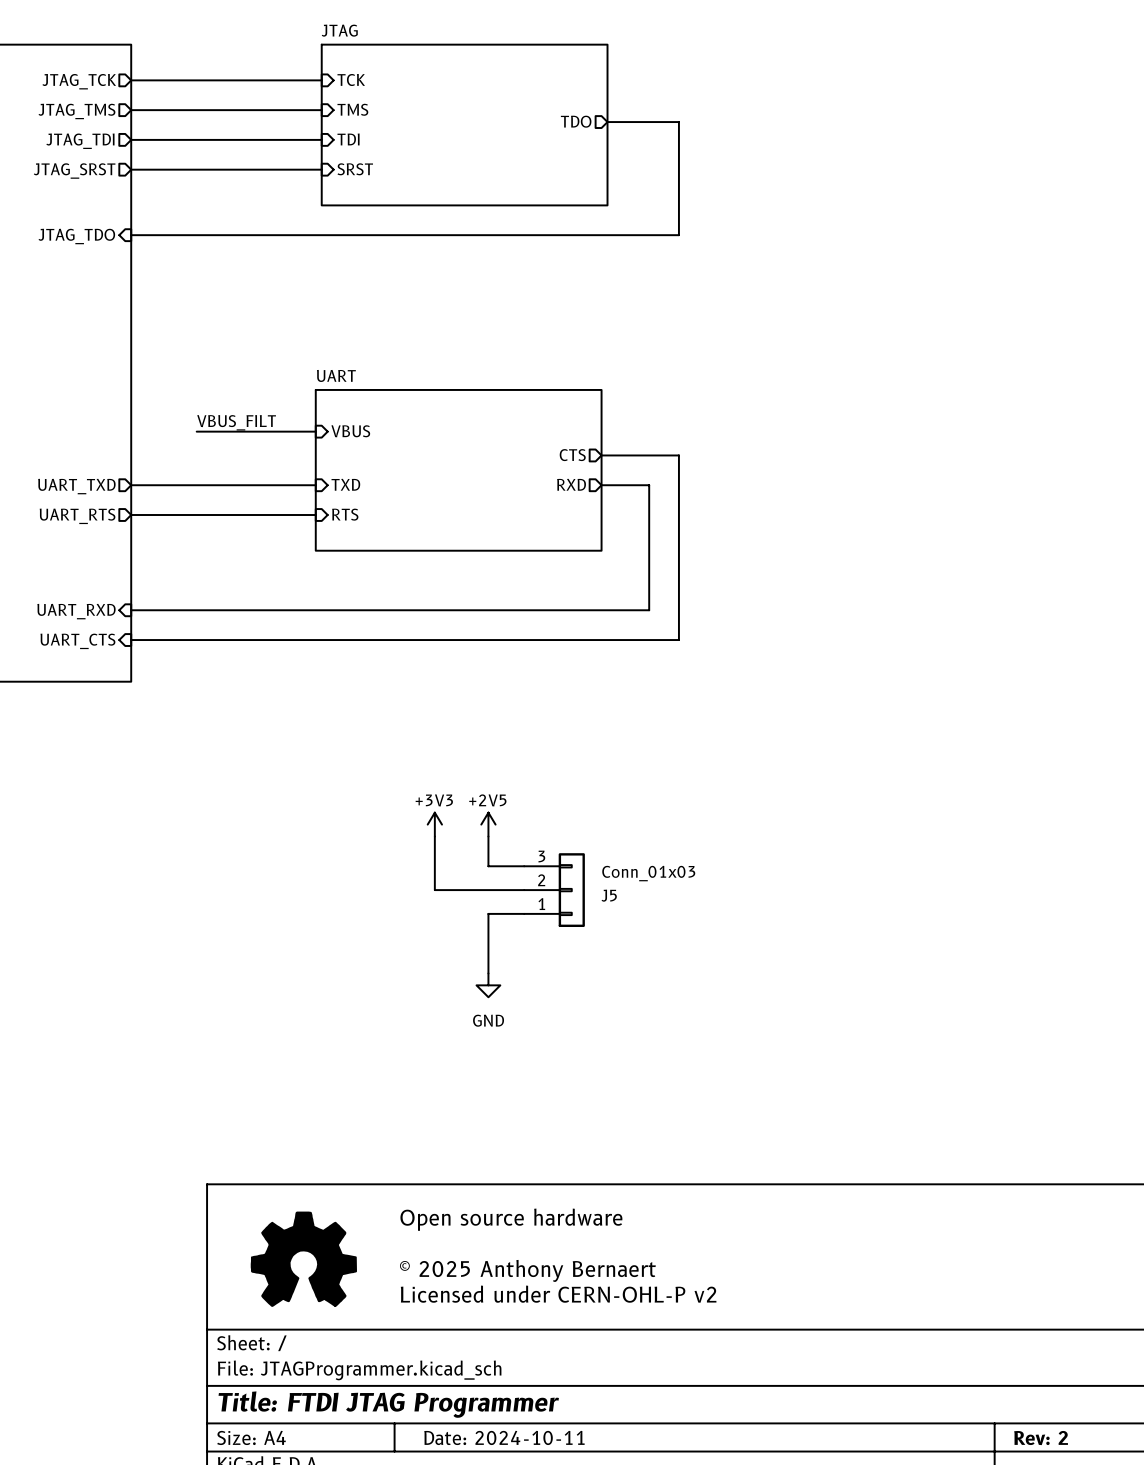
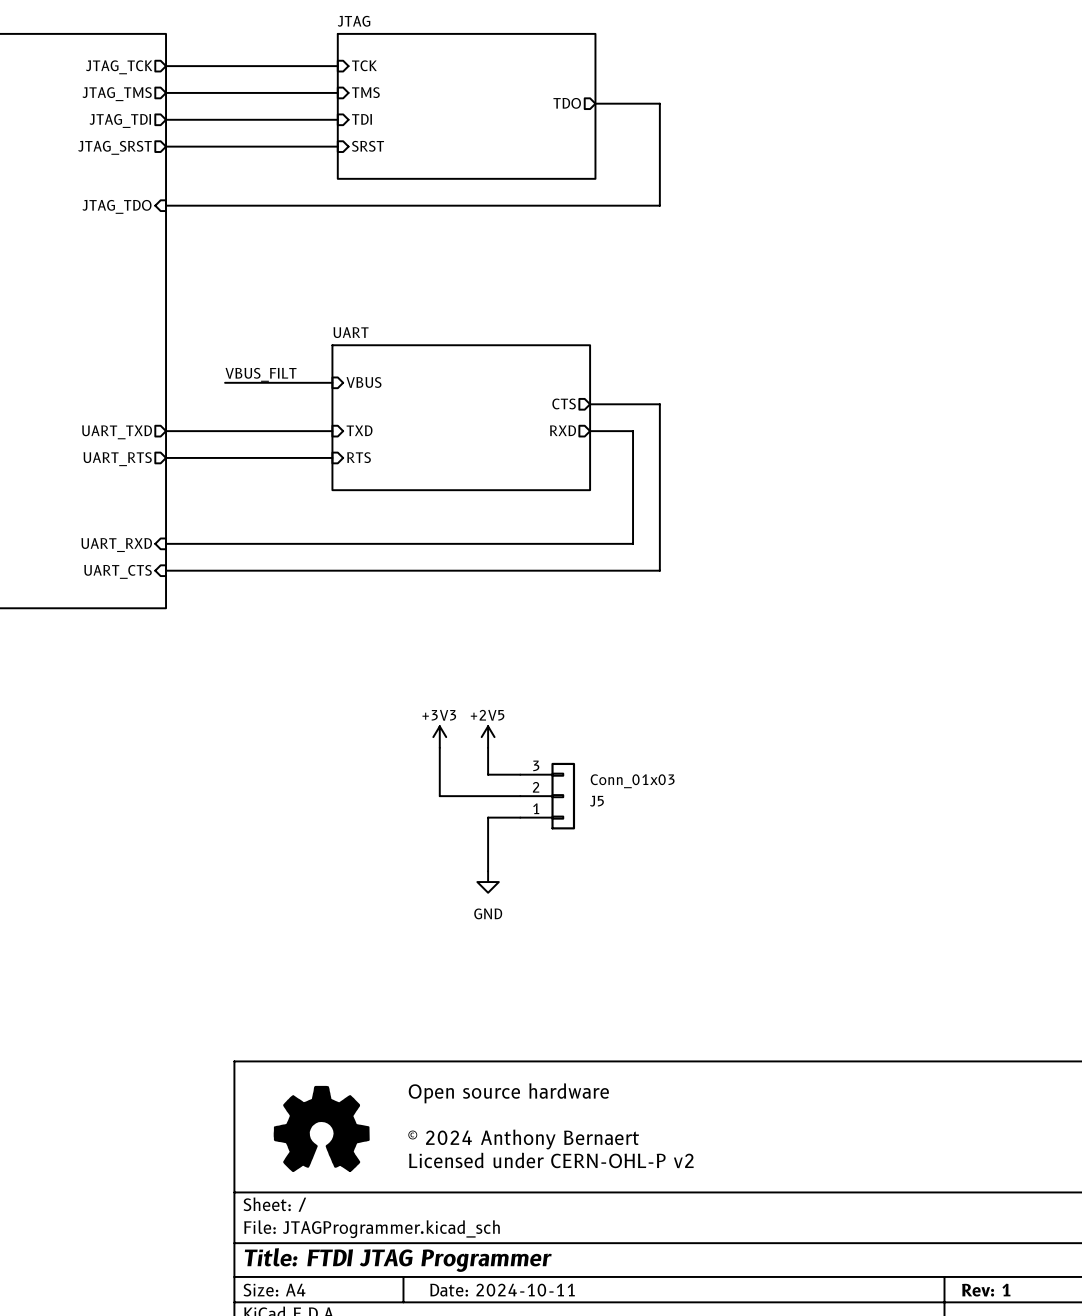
text: © 2025 Anthony Bernaert (527, 1270) -> © 2024 Anthony Bernaert (523, 1139)
title block: Rev: 2 (1041, 1438) -> Rev: 1 (986, 1290)

